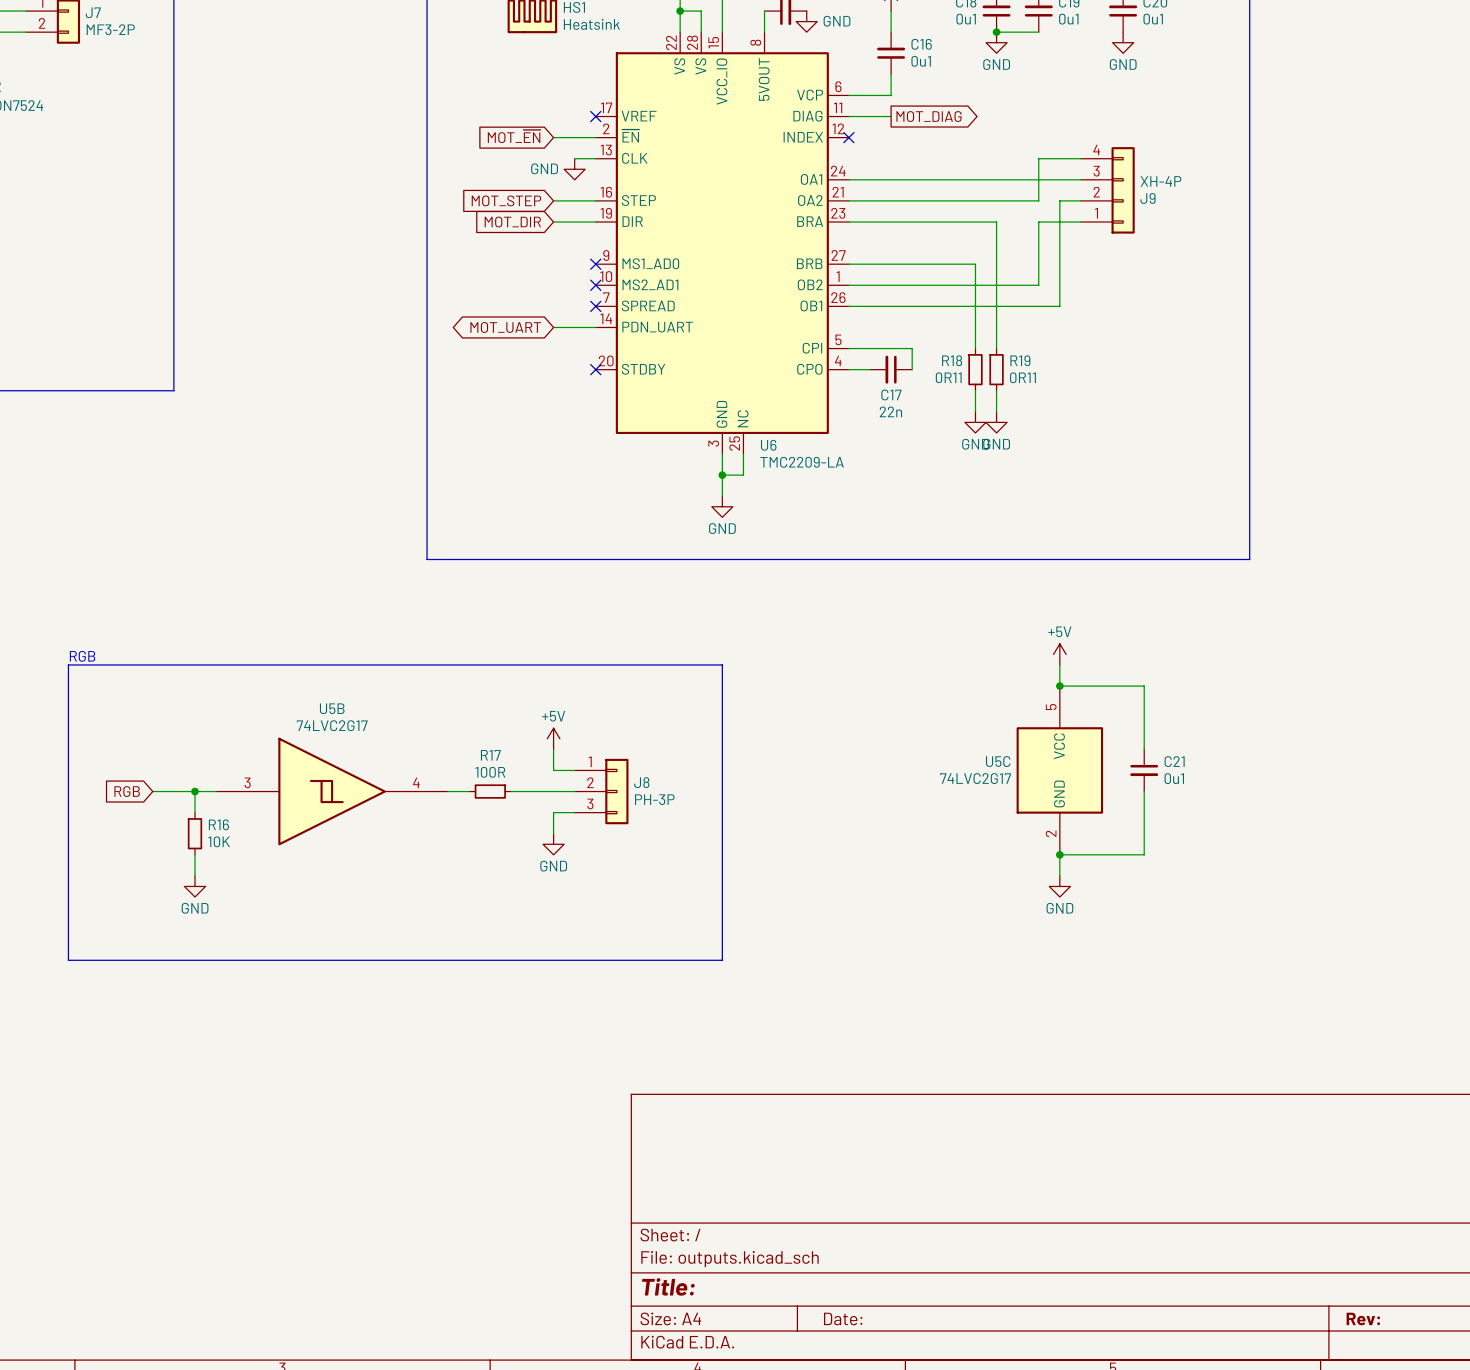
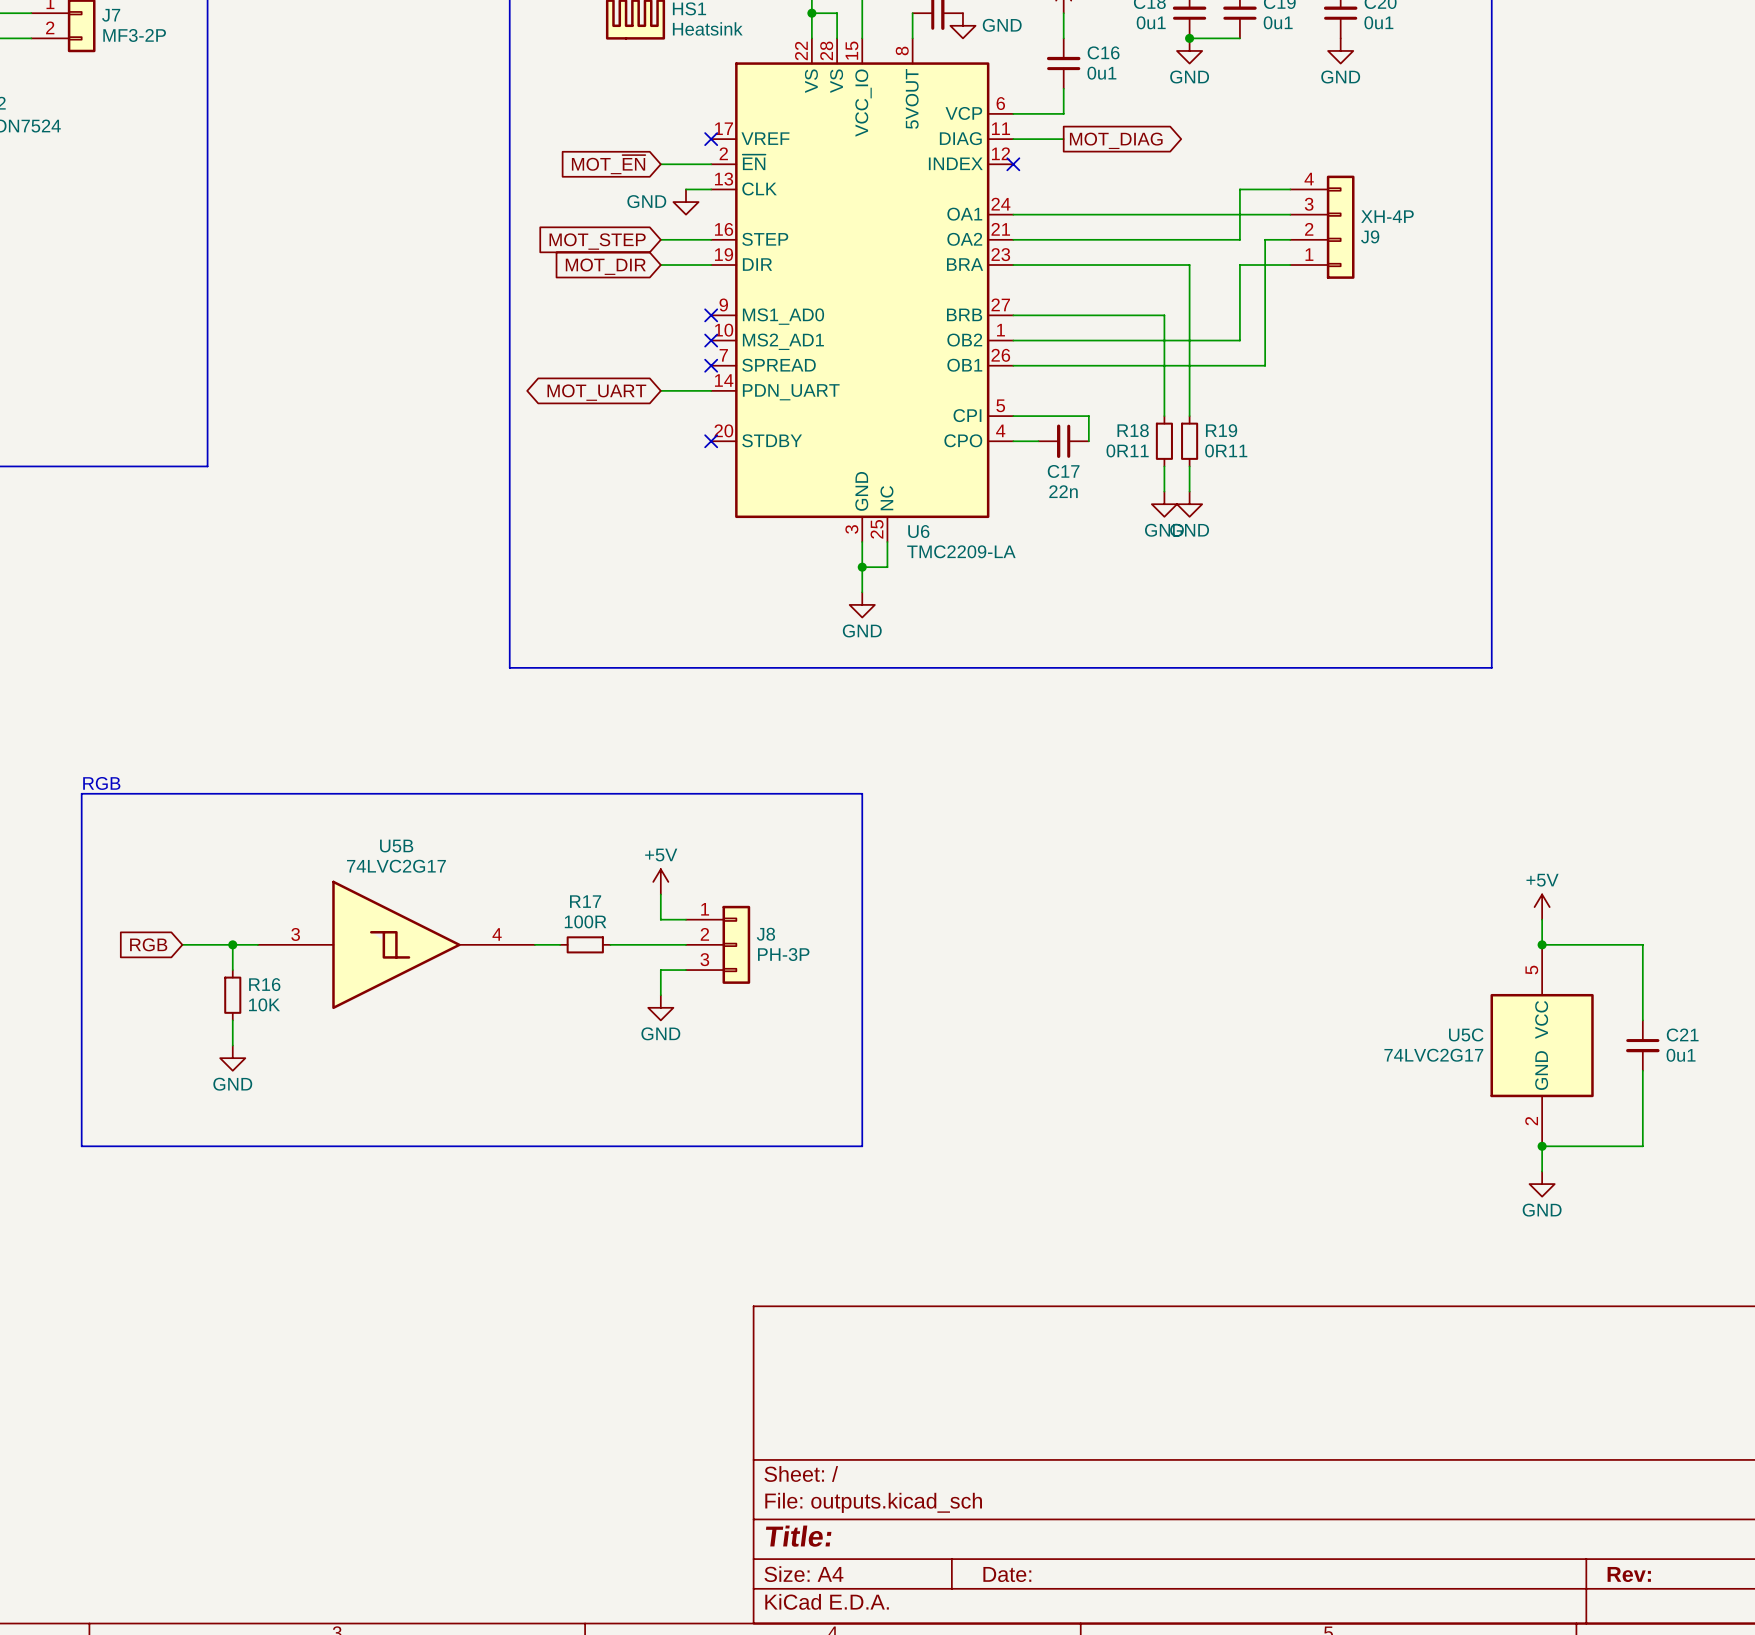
power symbol: +5V (1059, 654) -> none
wire: (1059, 664) (1059, 686) (1144, 686) (1144, 749) -> none
junction: (1059, 686) -> none
power symbol: none -> +5V (1542, 907)
U5C position: (1059, 770) -> (1542, 1045)
C21 position: (1144, 770) -> (1642, 1045)
wire: none -> (1542, 919) (1542, 944) (1642, 944) (1642, 1020)
wire: (1144, 791) (1144, 854) (1059, 854) (1059, 875) -> none
junction: none -> (1542, 944)
junction: (1059, 854) -> none
power symbol: GND (1059, 886) -> none
wire: none -> (1642, 1070) (1642, 1146) (1542, 1146) (1542, 1171)
junction: none -> (1542, 1146)
power symbol: none -> GND (1542, 1184)

